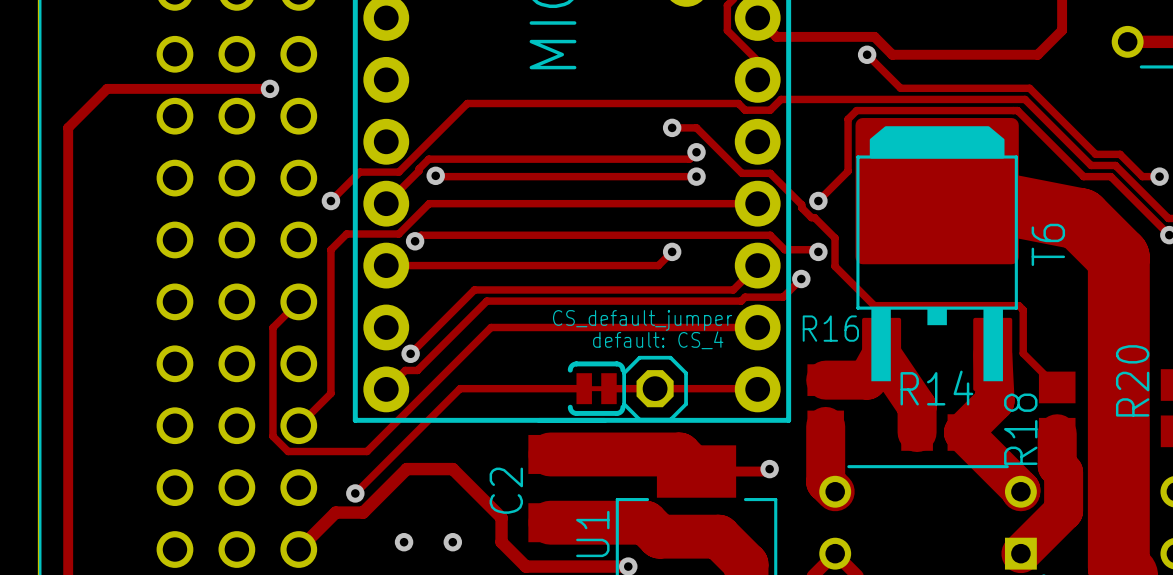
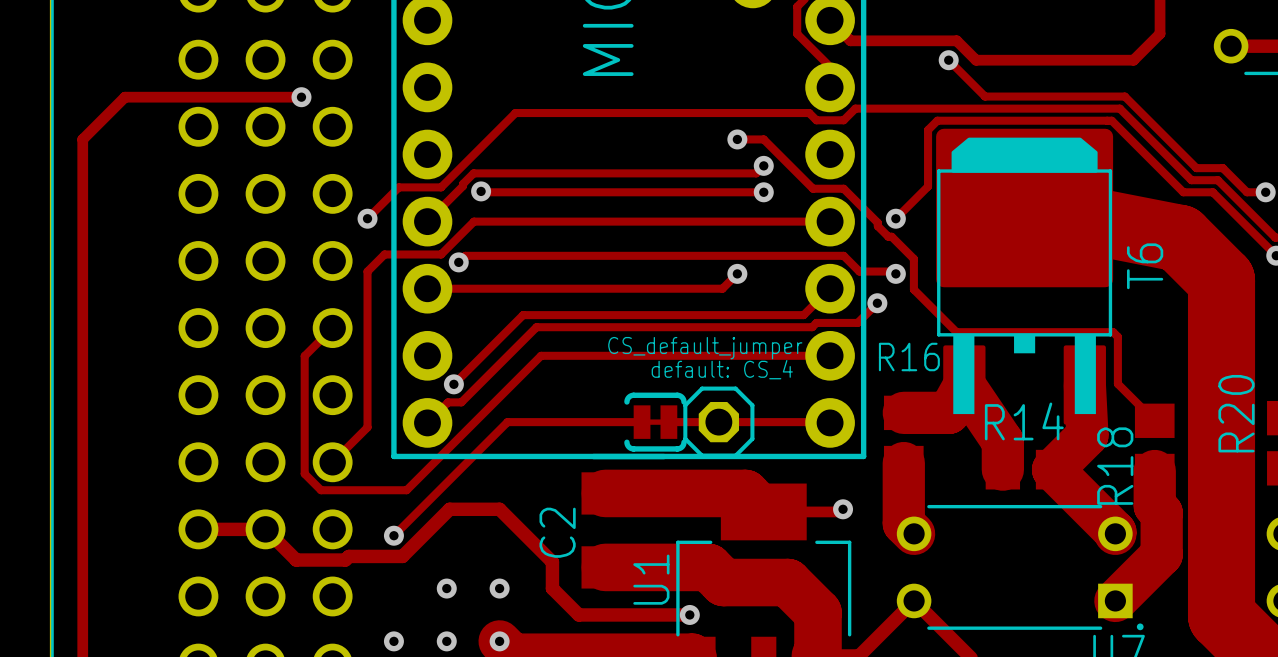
track: (335, 512) (298, 549) -> (372, 556) (348, 556) (345, 560) (296, 560) (265, 529) (198, 529)

